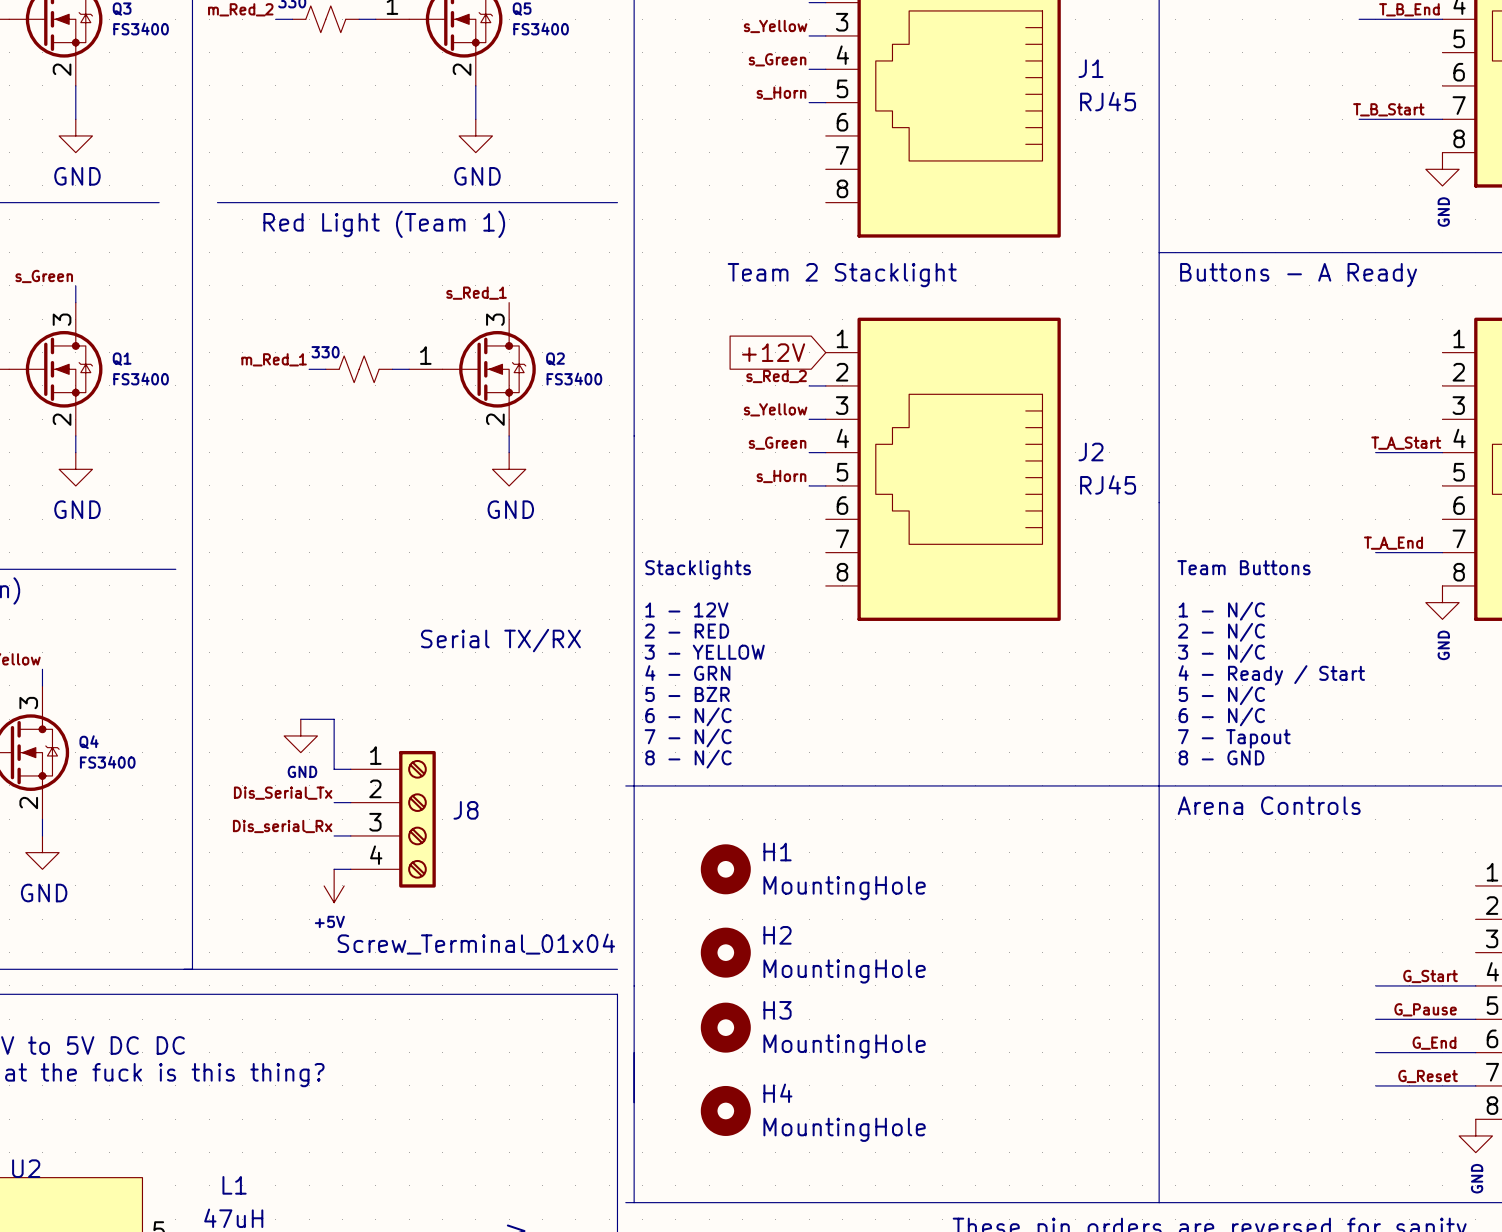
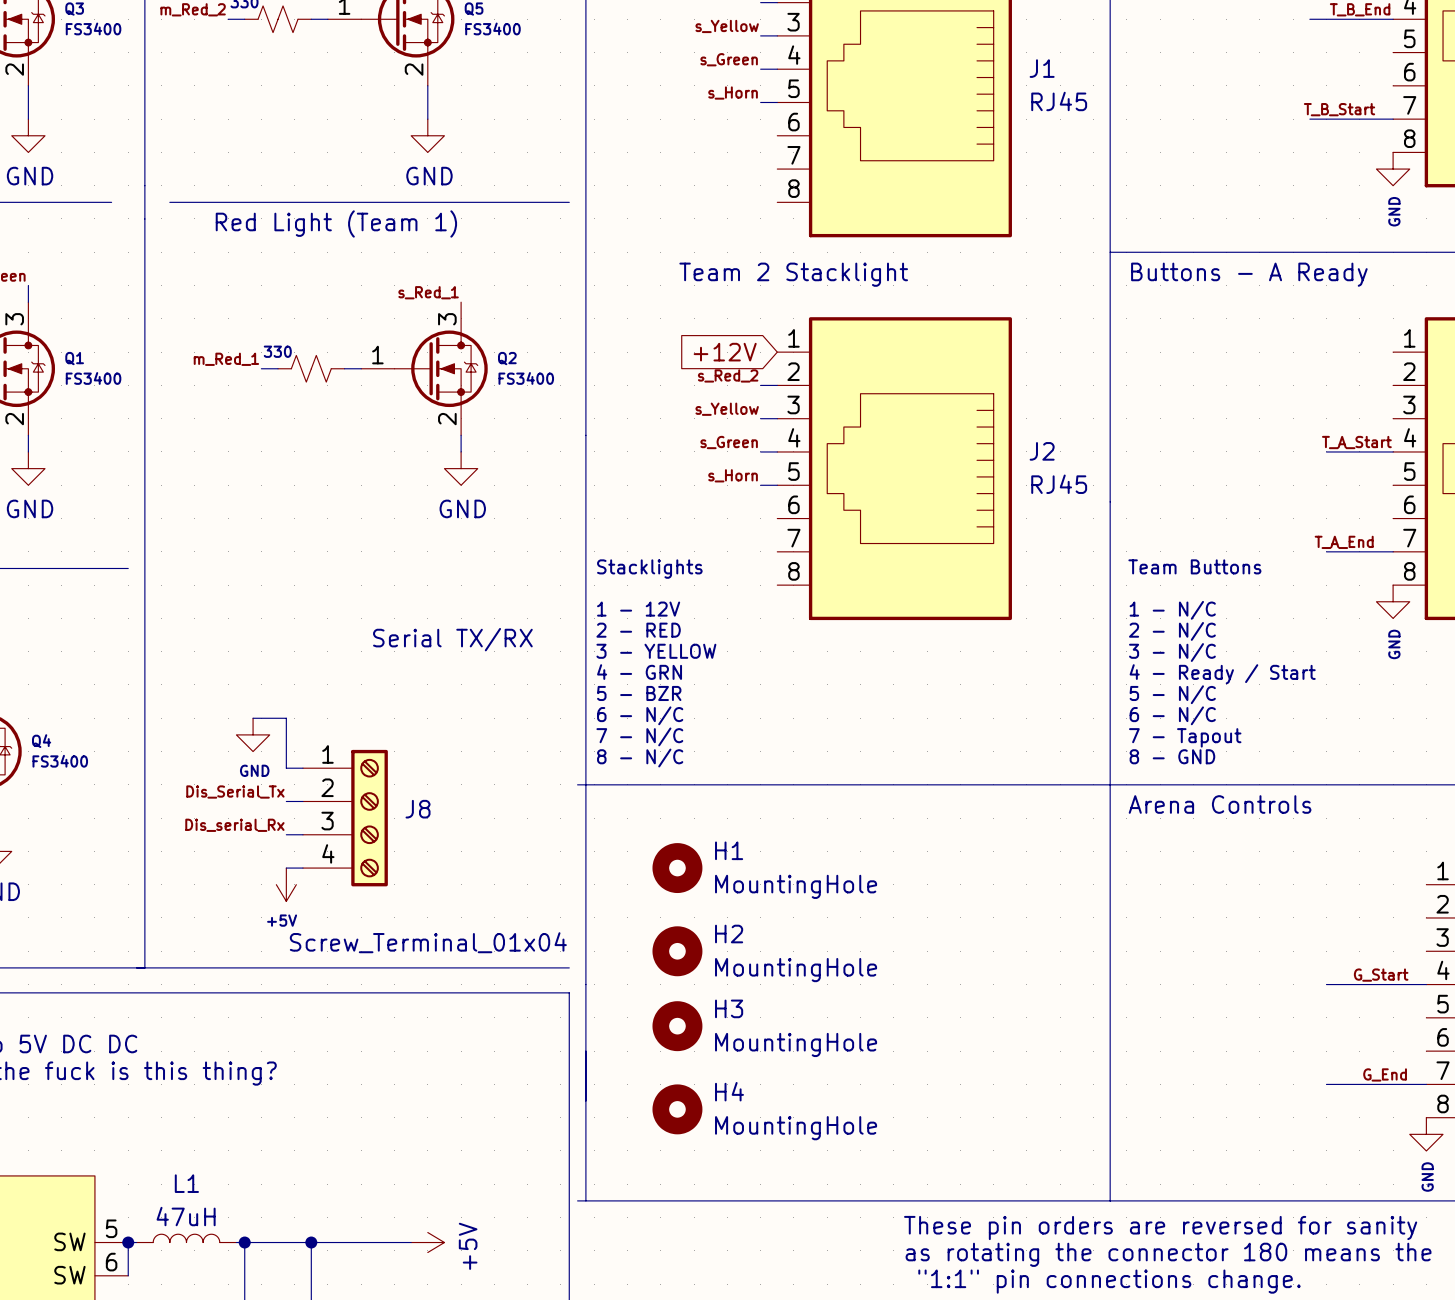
label: G_Pause (1425, 1009) -> none
wire: (1375, 1019) (1475, 1019) -> none
label: G_End (1434, 1043) -> none
wire: (1375, 1052) (1475, 1052) -> none
label: G_Reset (1428, 1076) -> G_End (1385, 1074)

